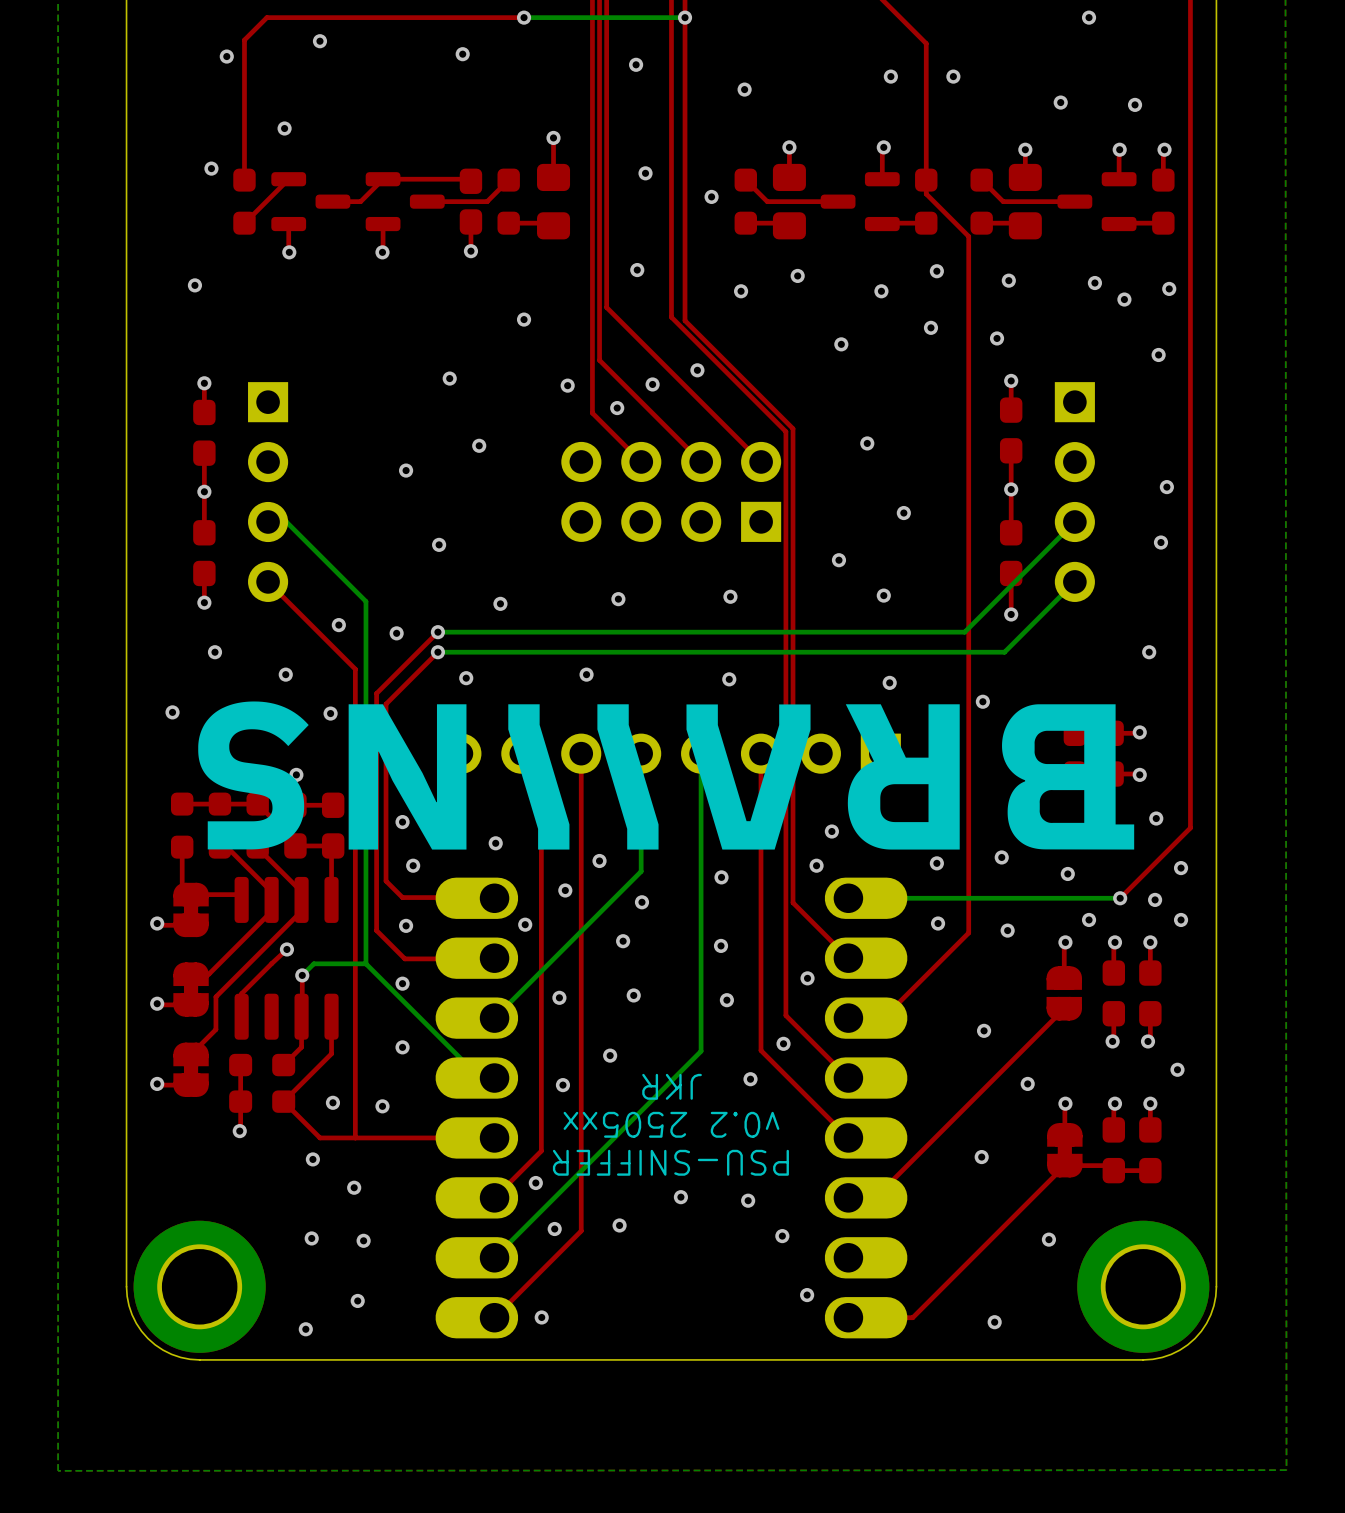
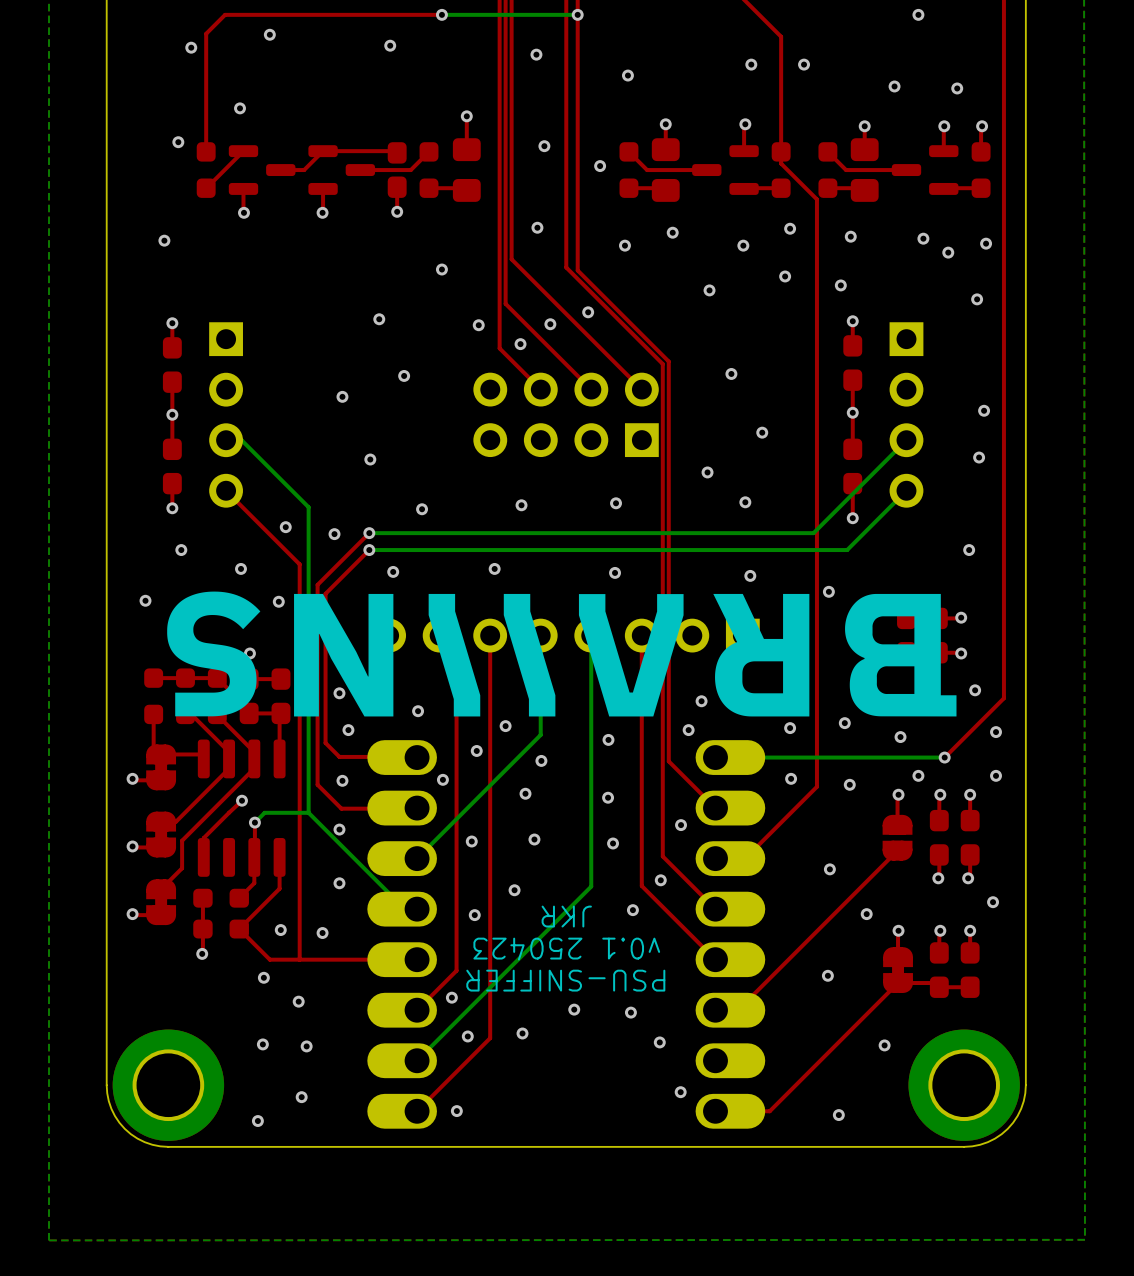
via: (1155, 899) -> none
text: v0.2 2505xx (671, 1124) -> v0.1 250423 (566, 949)

